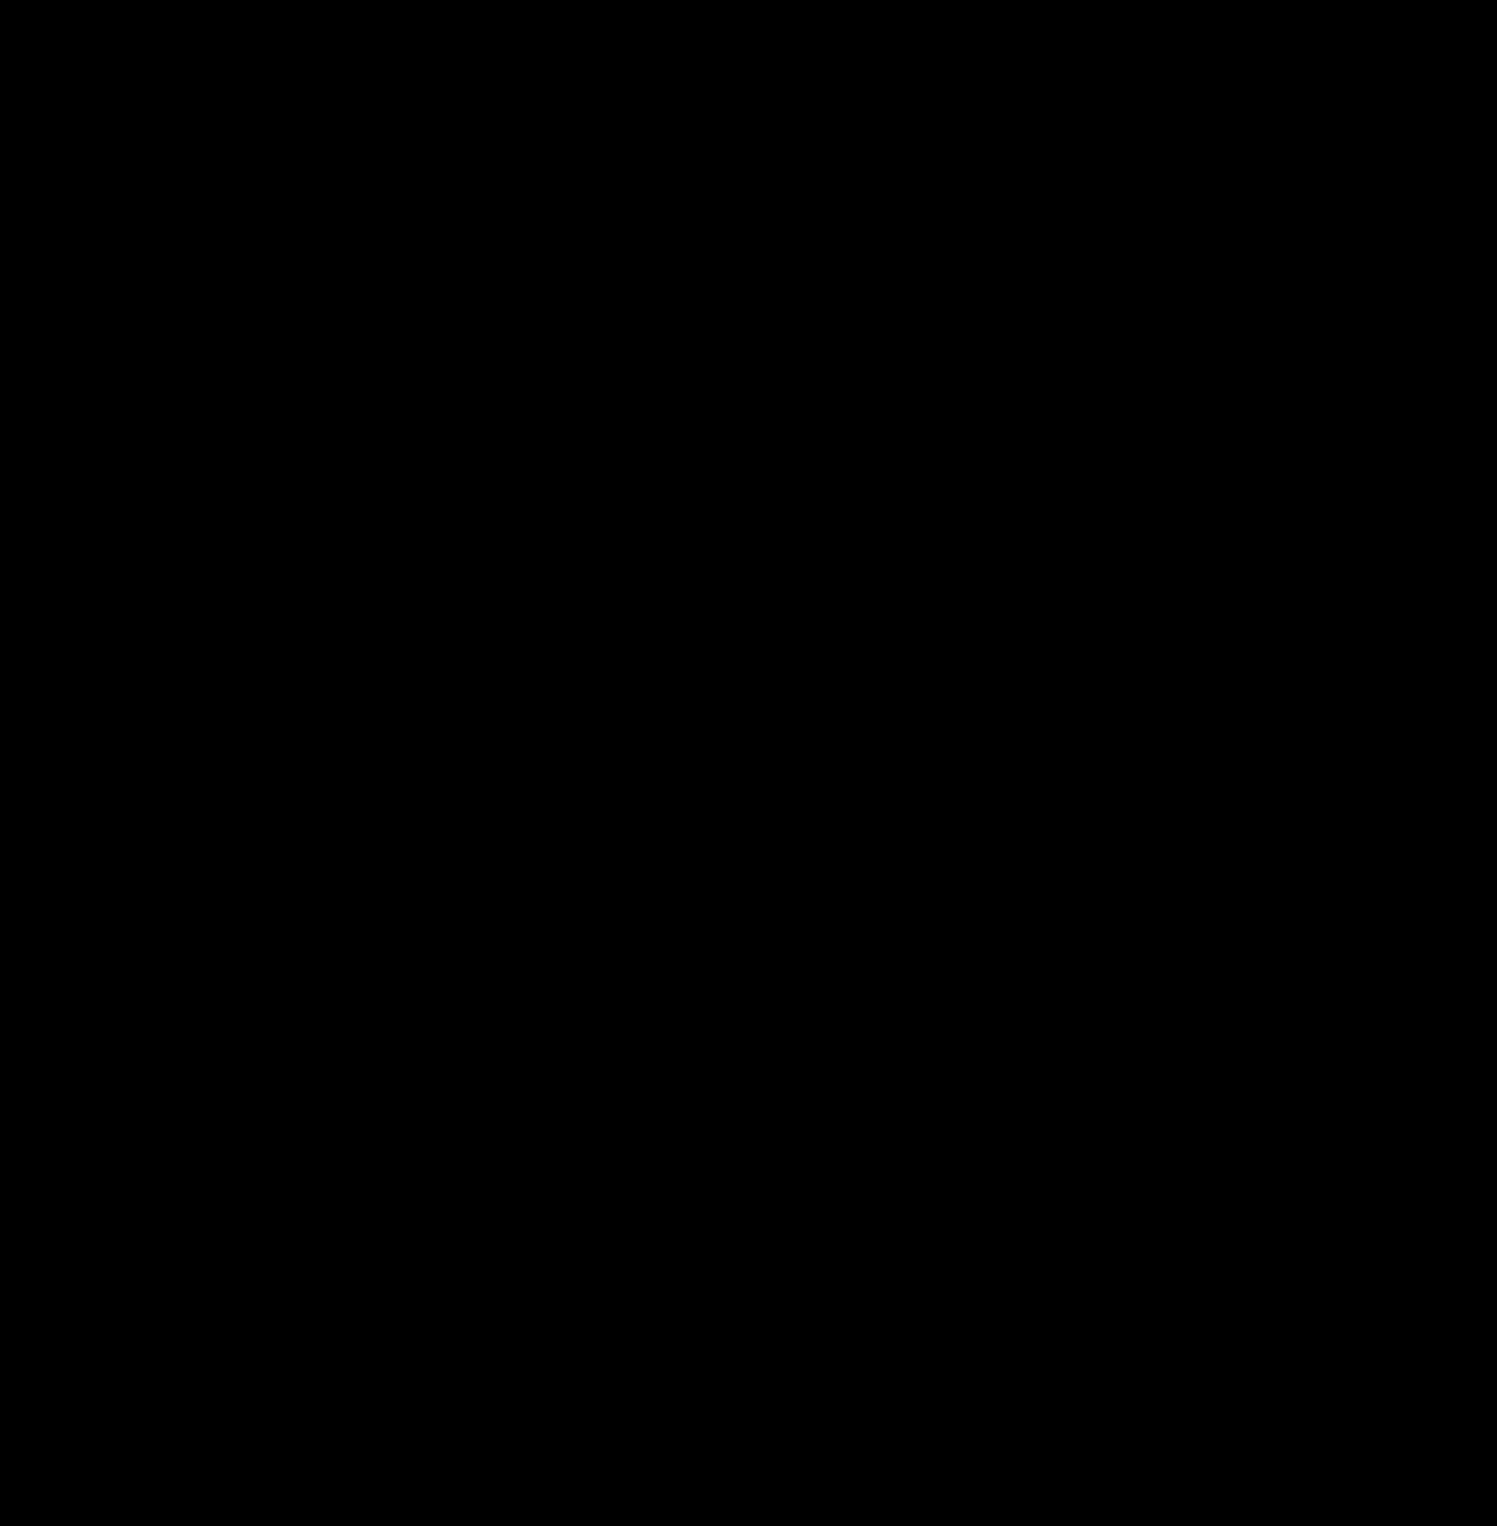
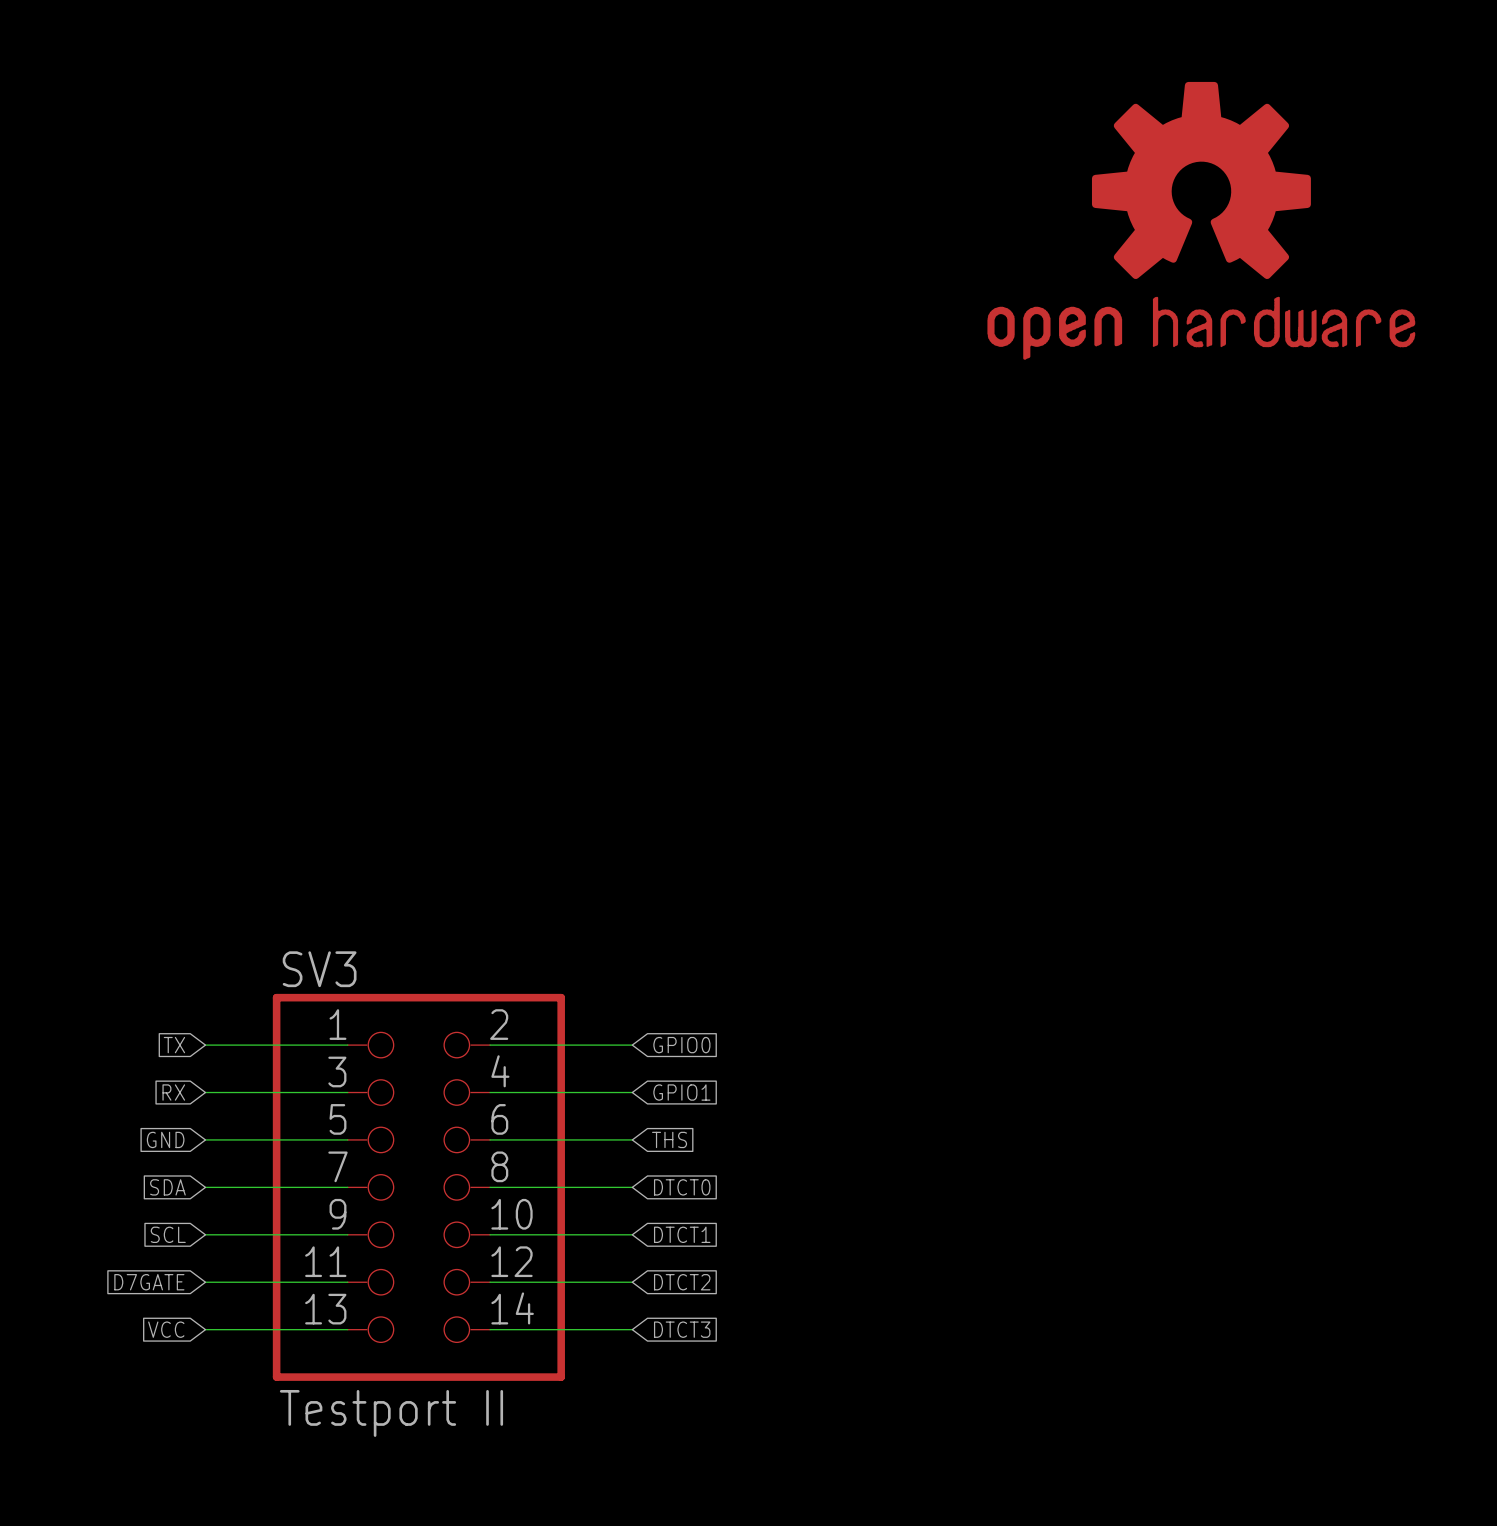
part: none -> (1201, 220)
global label: none -> TX (174, 1045)
wire: none -> (205, 1045) (347, 1045)
wire: none -> (490, 1045) (632, 1045)
global label: none -> GPIO0 (681, 1045)
global label: none -> RX (173, 1092)
wire: none -> (205, 1092) (347, 1092)
wire: none -> (490, 1092) (632, 1092)
global label: none -> GPIO1 (681, 1092)
global label: none -> GND (165, 1139)
wire: none -> (205, 1139) (347, 1139)
wire: none -> (490, 1139) (632, 1139)
global label: none -> THS (669, 1139)
global label: none -> SDA (167, 1187)
wire: none -> (205, 1187) (347, 1187)
SV3: none -> Testport II (418, 1187)
wire: none -> (490, 1187) (632, 1187)
global label: none -> DTCT0 (682, 1187)
global label: none -> SCL (168, 1234)
wire: none -> (205, 1234) (347, 1234)
wire: none -> (490, 1234) (632, 1234)
global label: none -> DTCT1 (682, 1234)
global label: none -> D7GATE (149, 1282)
wire: none -> (205, 1282) (347, 1282)
wire: none -> (490, 1282) (632, 1282)
global label: none -> DTCT2 (682, 1282)
global label: none -> VCC (166, 1329)
wire: none -> (205, 1329) (347, 1329)
wire: none -> (490, 1329) (632, 1329)
global label: none -> DTCT3 (682, 1329)

